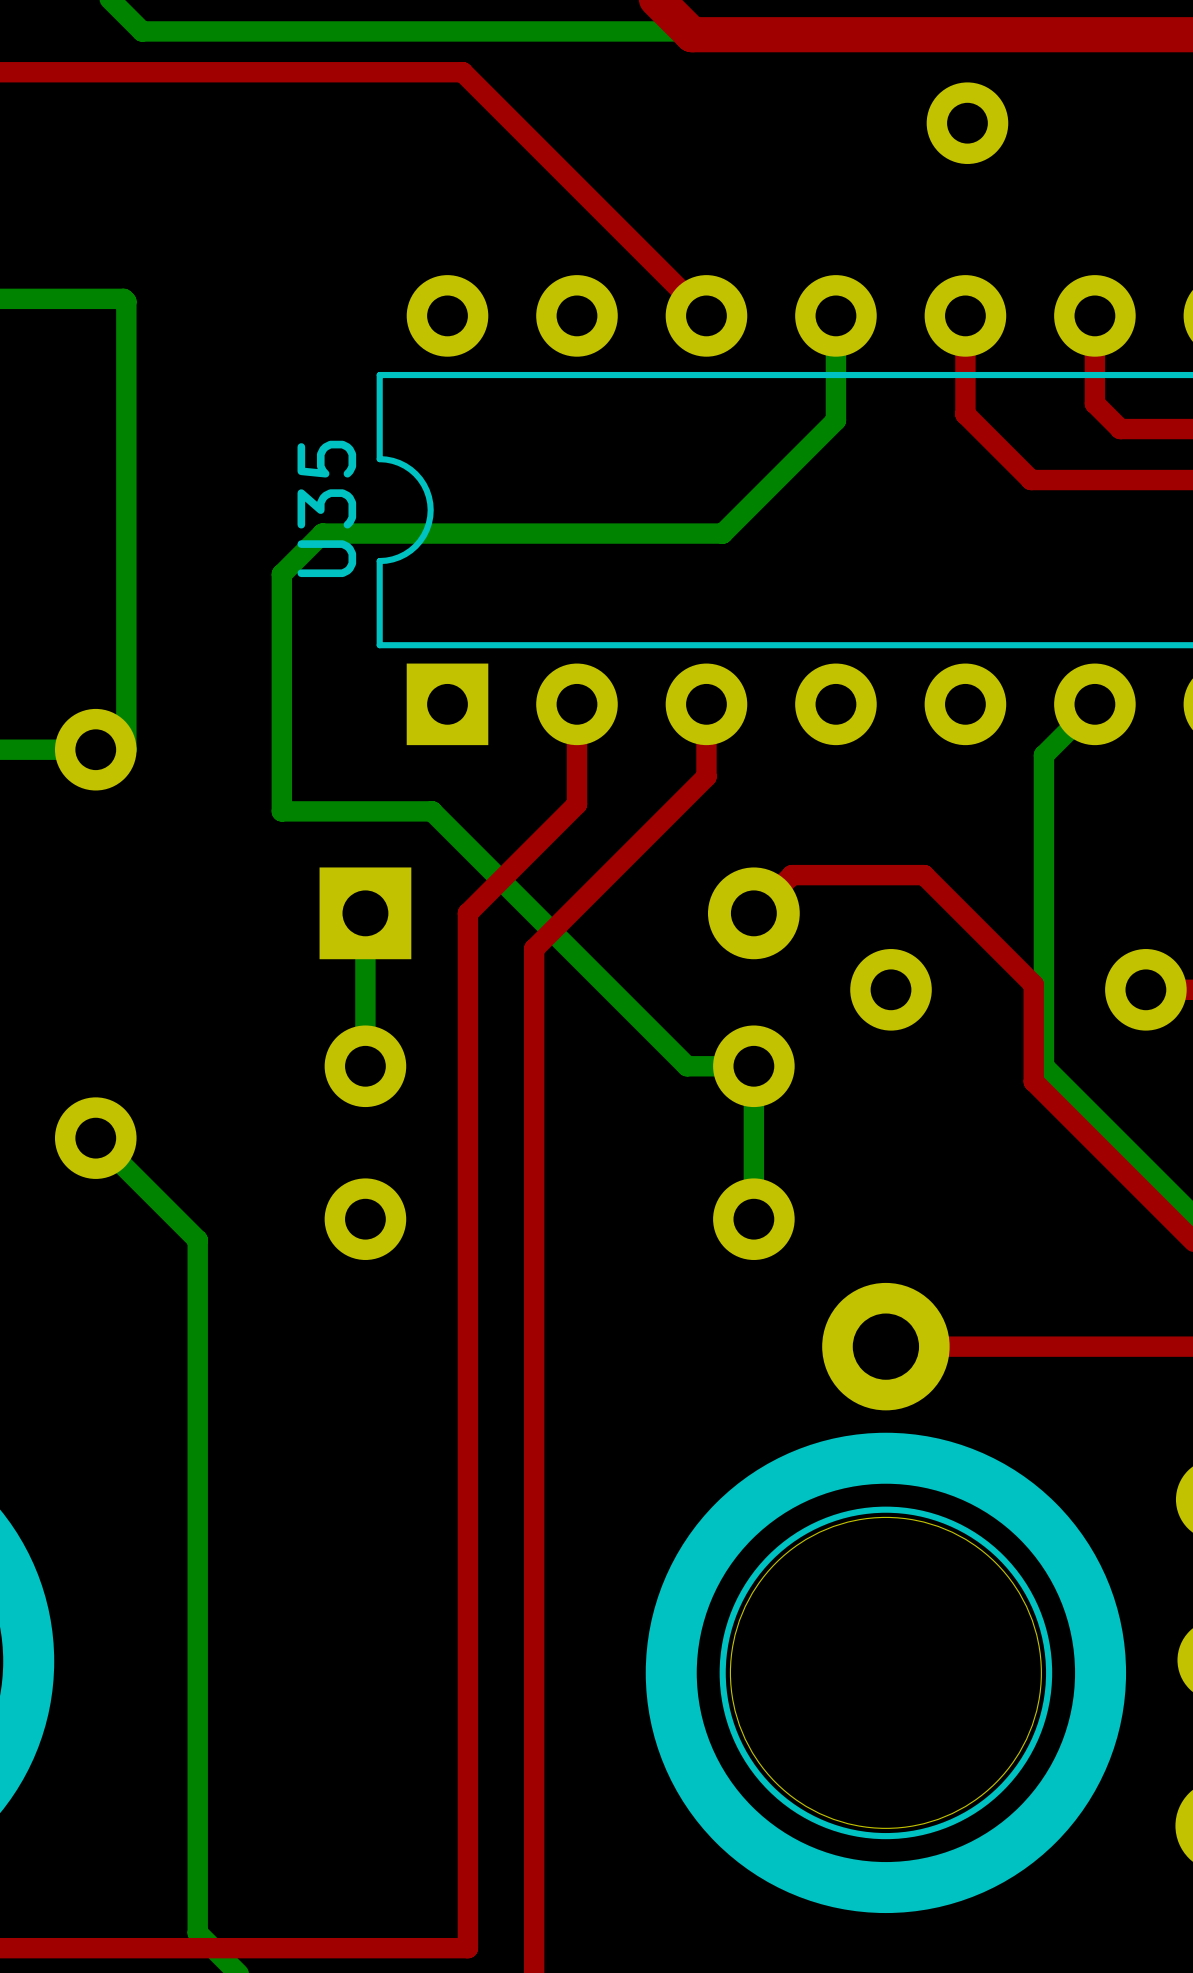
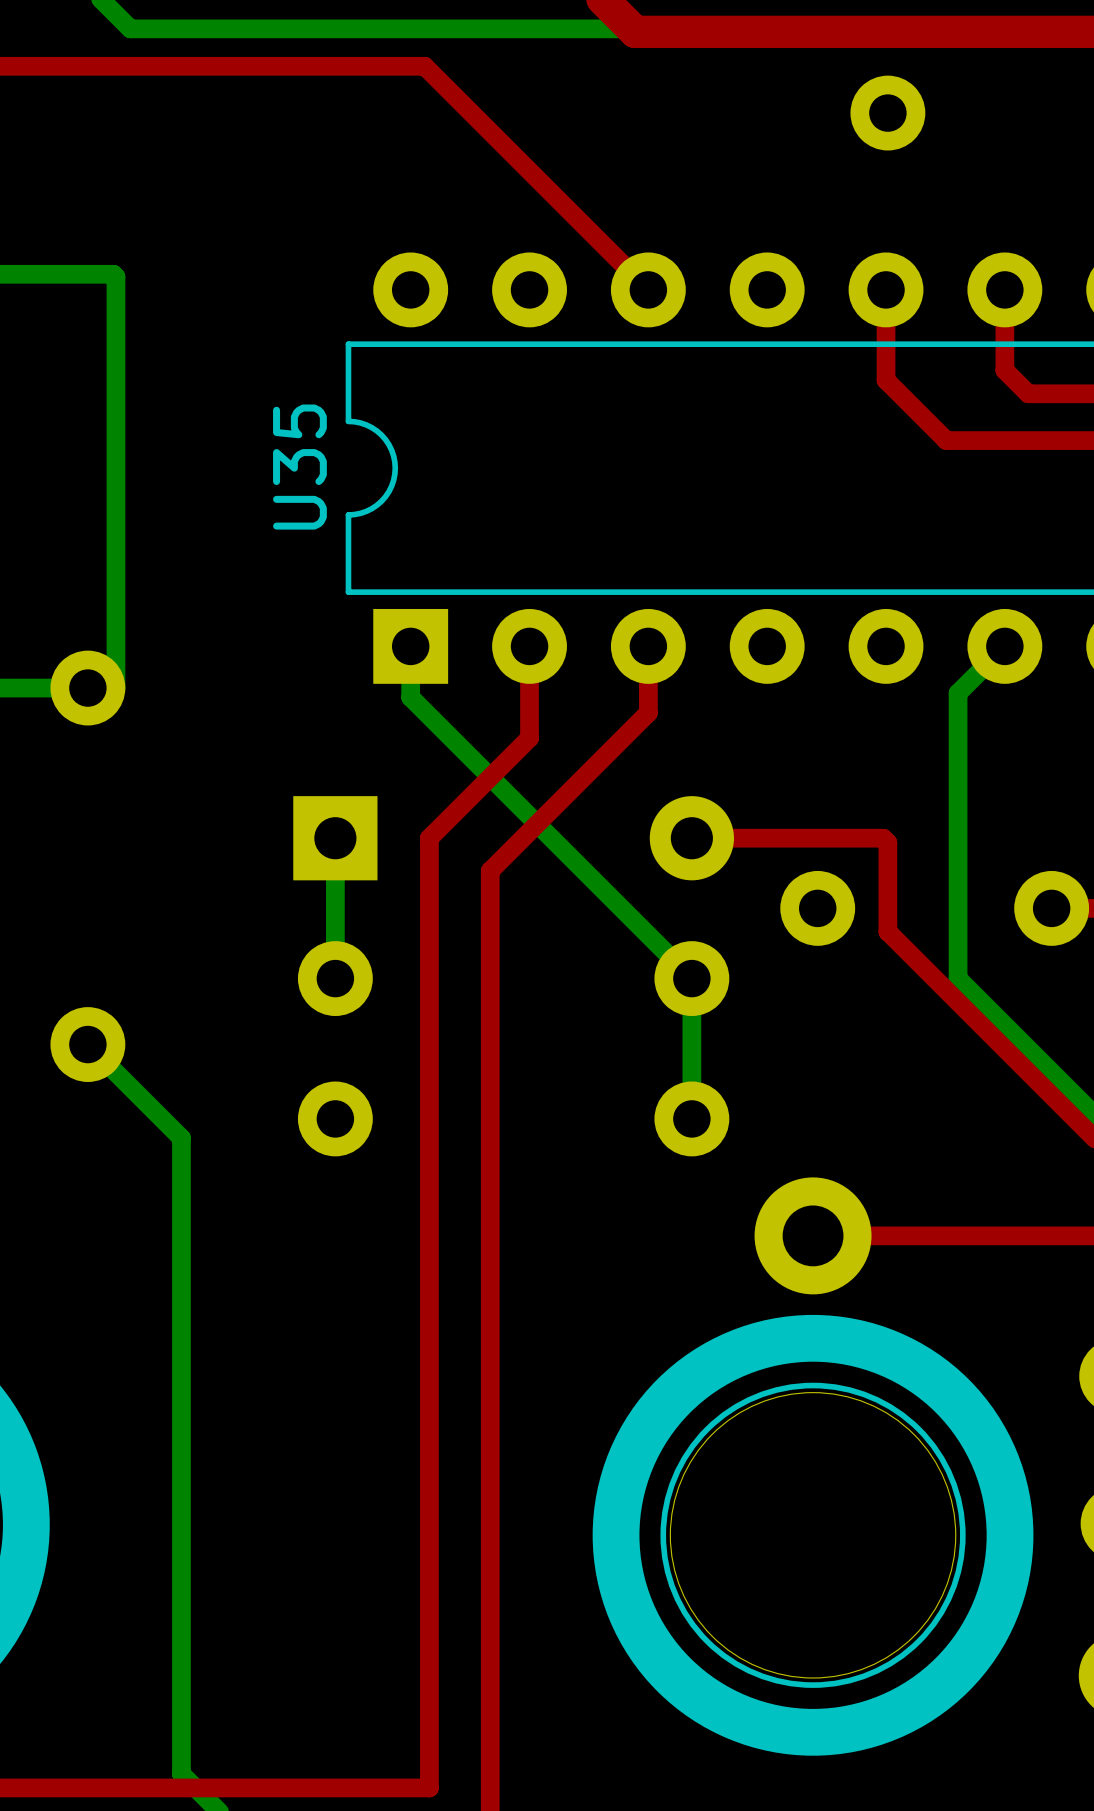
bottom track: (835, 315) (835, 420) (722, 533) (322, 533) (281, 574) (281, 811) (432, 811) (687, 1066) (753, 1066) -> (410, 646) (410, 697) (691, 978)
top track: (753, 913) (792, 875) (924, 875) (962, 913) -> (691, 838) (883, 838)
top track: (967, 918) (1033, 984) (1033, 1081) -> (887, 842) (887, 931) (948, 992)

